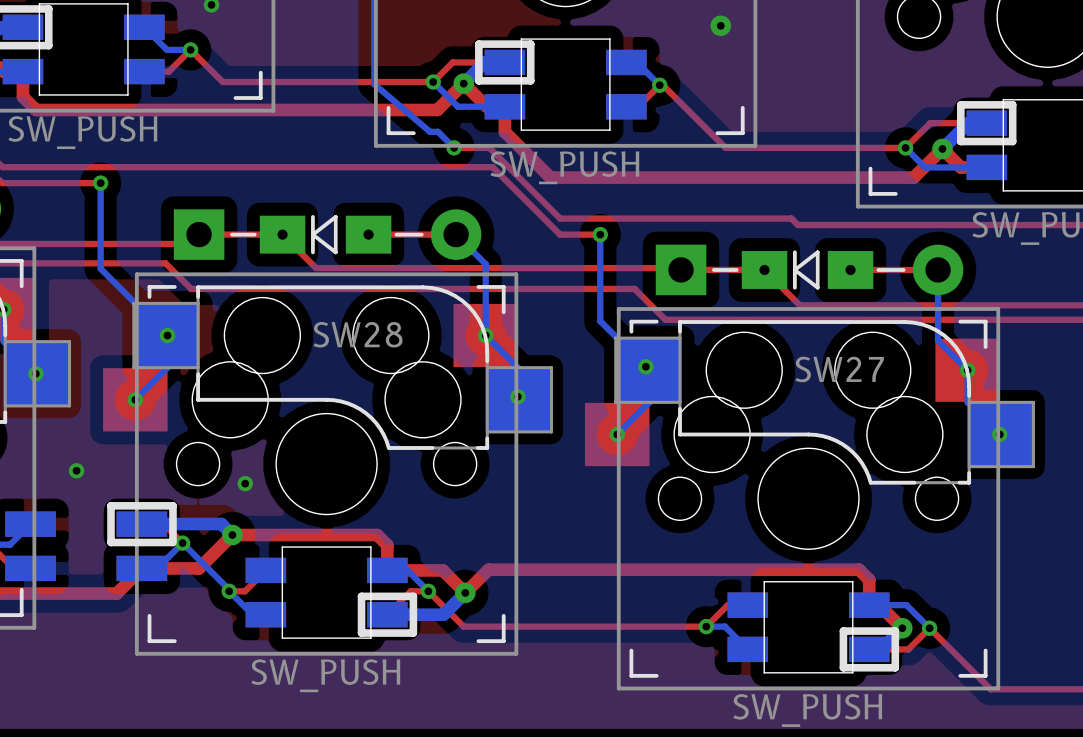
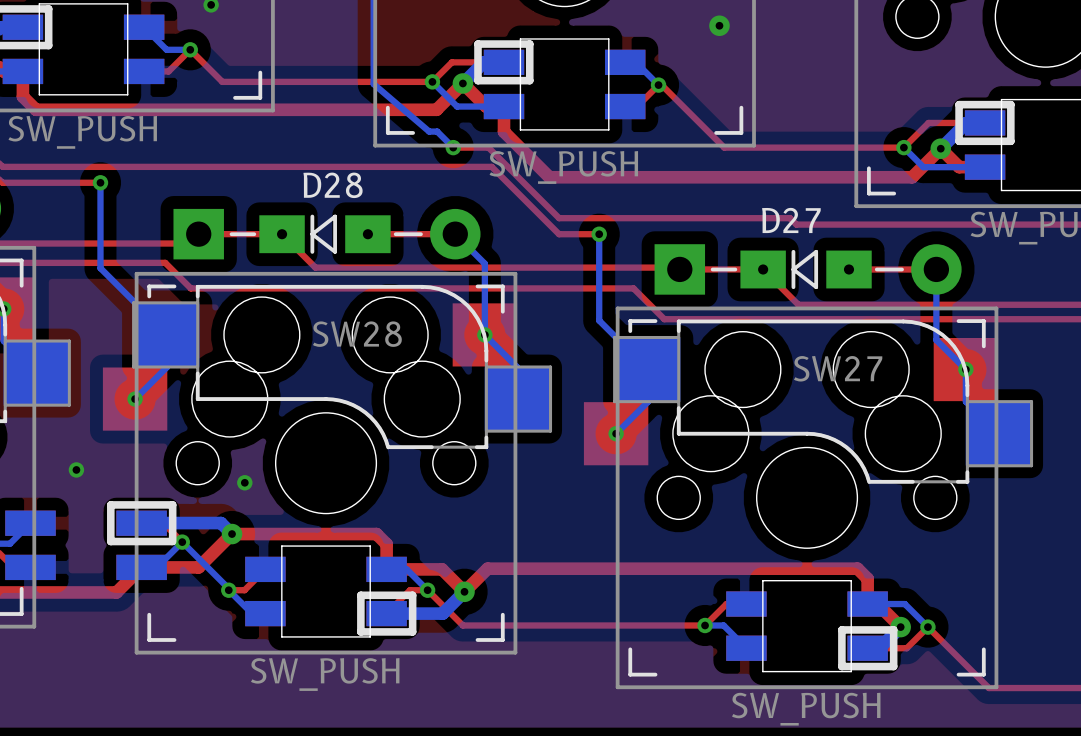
D28 name: none -> D28 (333, 185)
D27 name: none -> D27 (791, 220)
via: (167, 335) -> none
via: (645, 366) -> none
via: (35, 373) -> none
via: (517, 396) -> none
via: (999, 434) -> none

